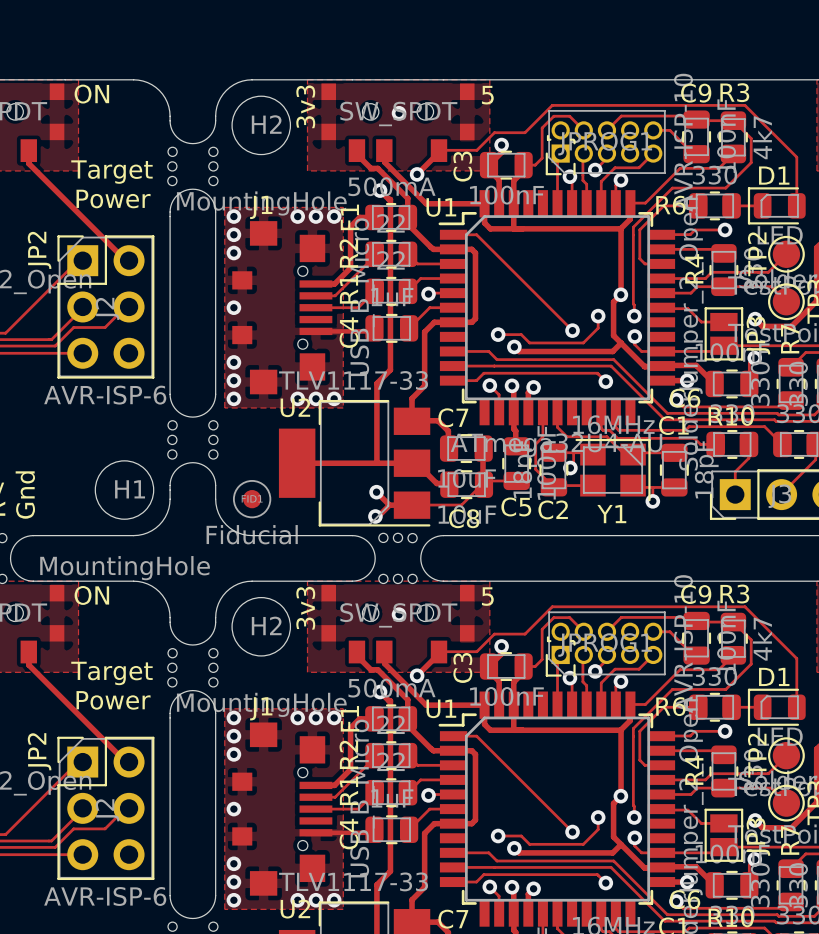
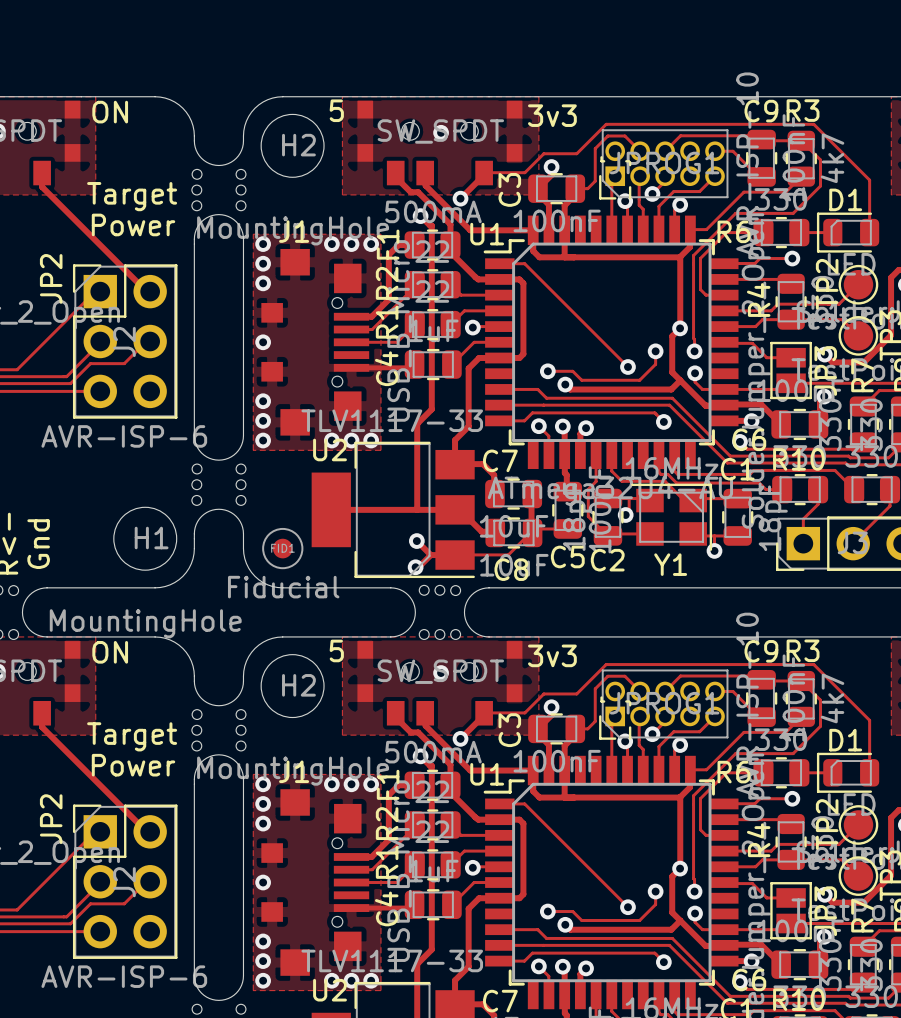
text: 5 (487, 95) -> 3v3 (552, 115)
text: 3v3 (305, 106) -> 5 (336, 110)
text: 5 (487, 596) -> 3v3 (552, 655)
text: 3v3 (305, 608) -> 5 (336, 650)

